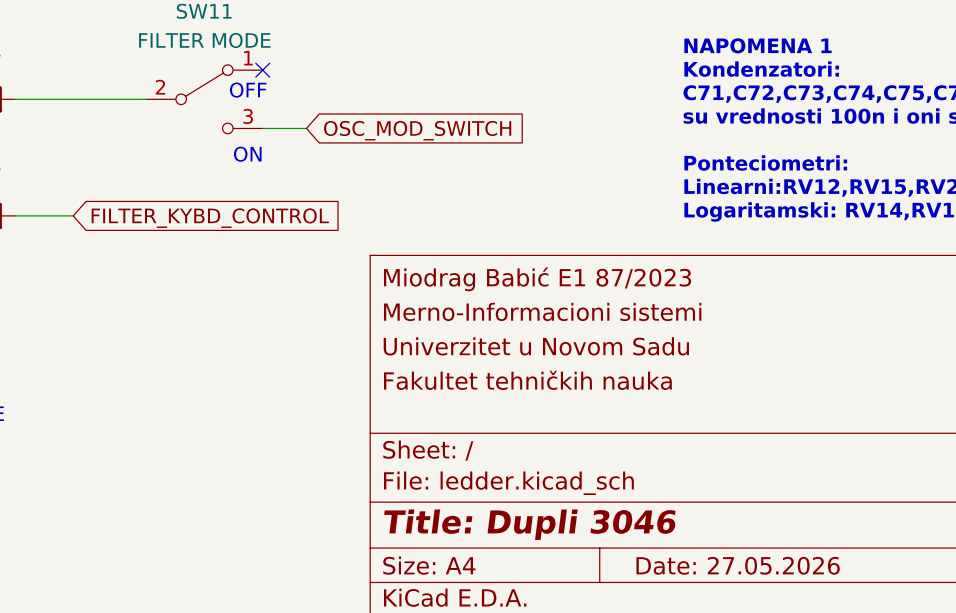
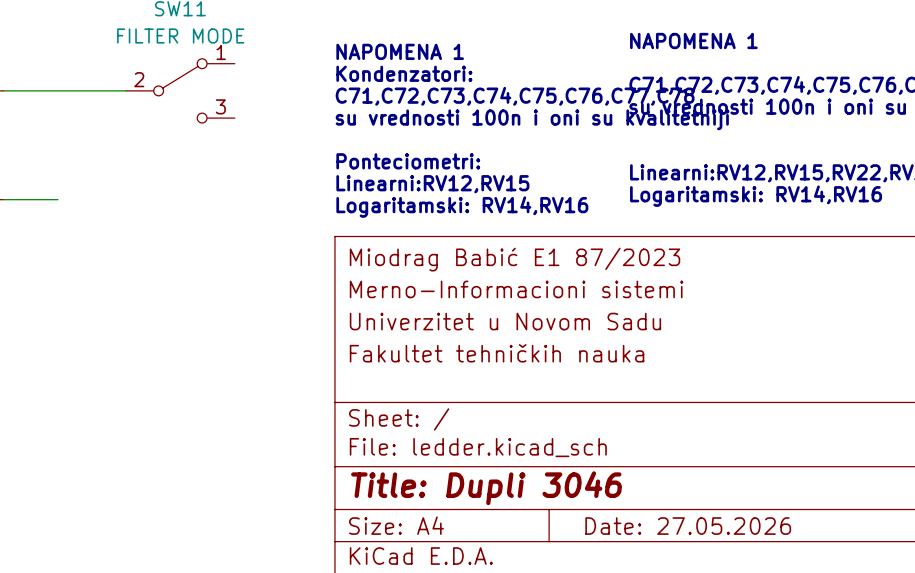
text: none -> NAPOMENA 1 (400, 51)
text: Kondenzatori: (761, 69) -> none
no-connect mark: (262, 70) -> none
text: none -> Kondenzatori: (404, 73)
text: OFF (248, 90) -> none
text: none -> C71,C72,C73,C74,C75,C76,C77,C78 (515, 96)
wire: (262, 128) (306, 128) -> none
text: none -> su vrednosti 100n i oni su kvalitetniji (532, 119)
global label: OSC_MOD_SWITCH (417, 130) -> none
text: ON (247, 154) -> none
text: Ponteciometri: (765, 162) -> none
text: none -> Ponteciometri: (408, 161)
text: none -> Linearni:RV12,RV15 (432, 184)
global label: FILTER_KYBD_CONTROL (210, 218) -> none
text: none -> Logaritamski: RV14,RV16 (462, 207)

